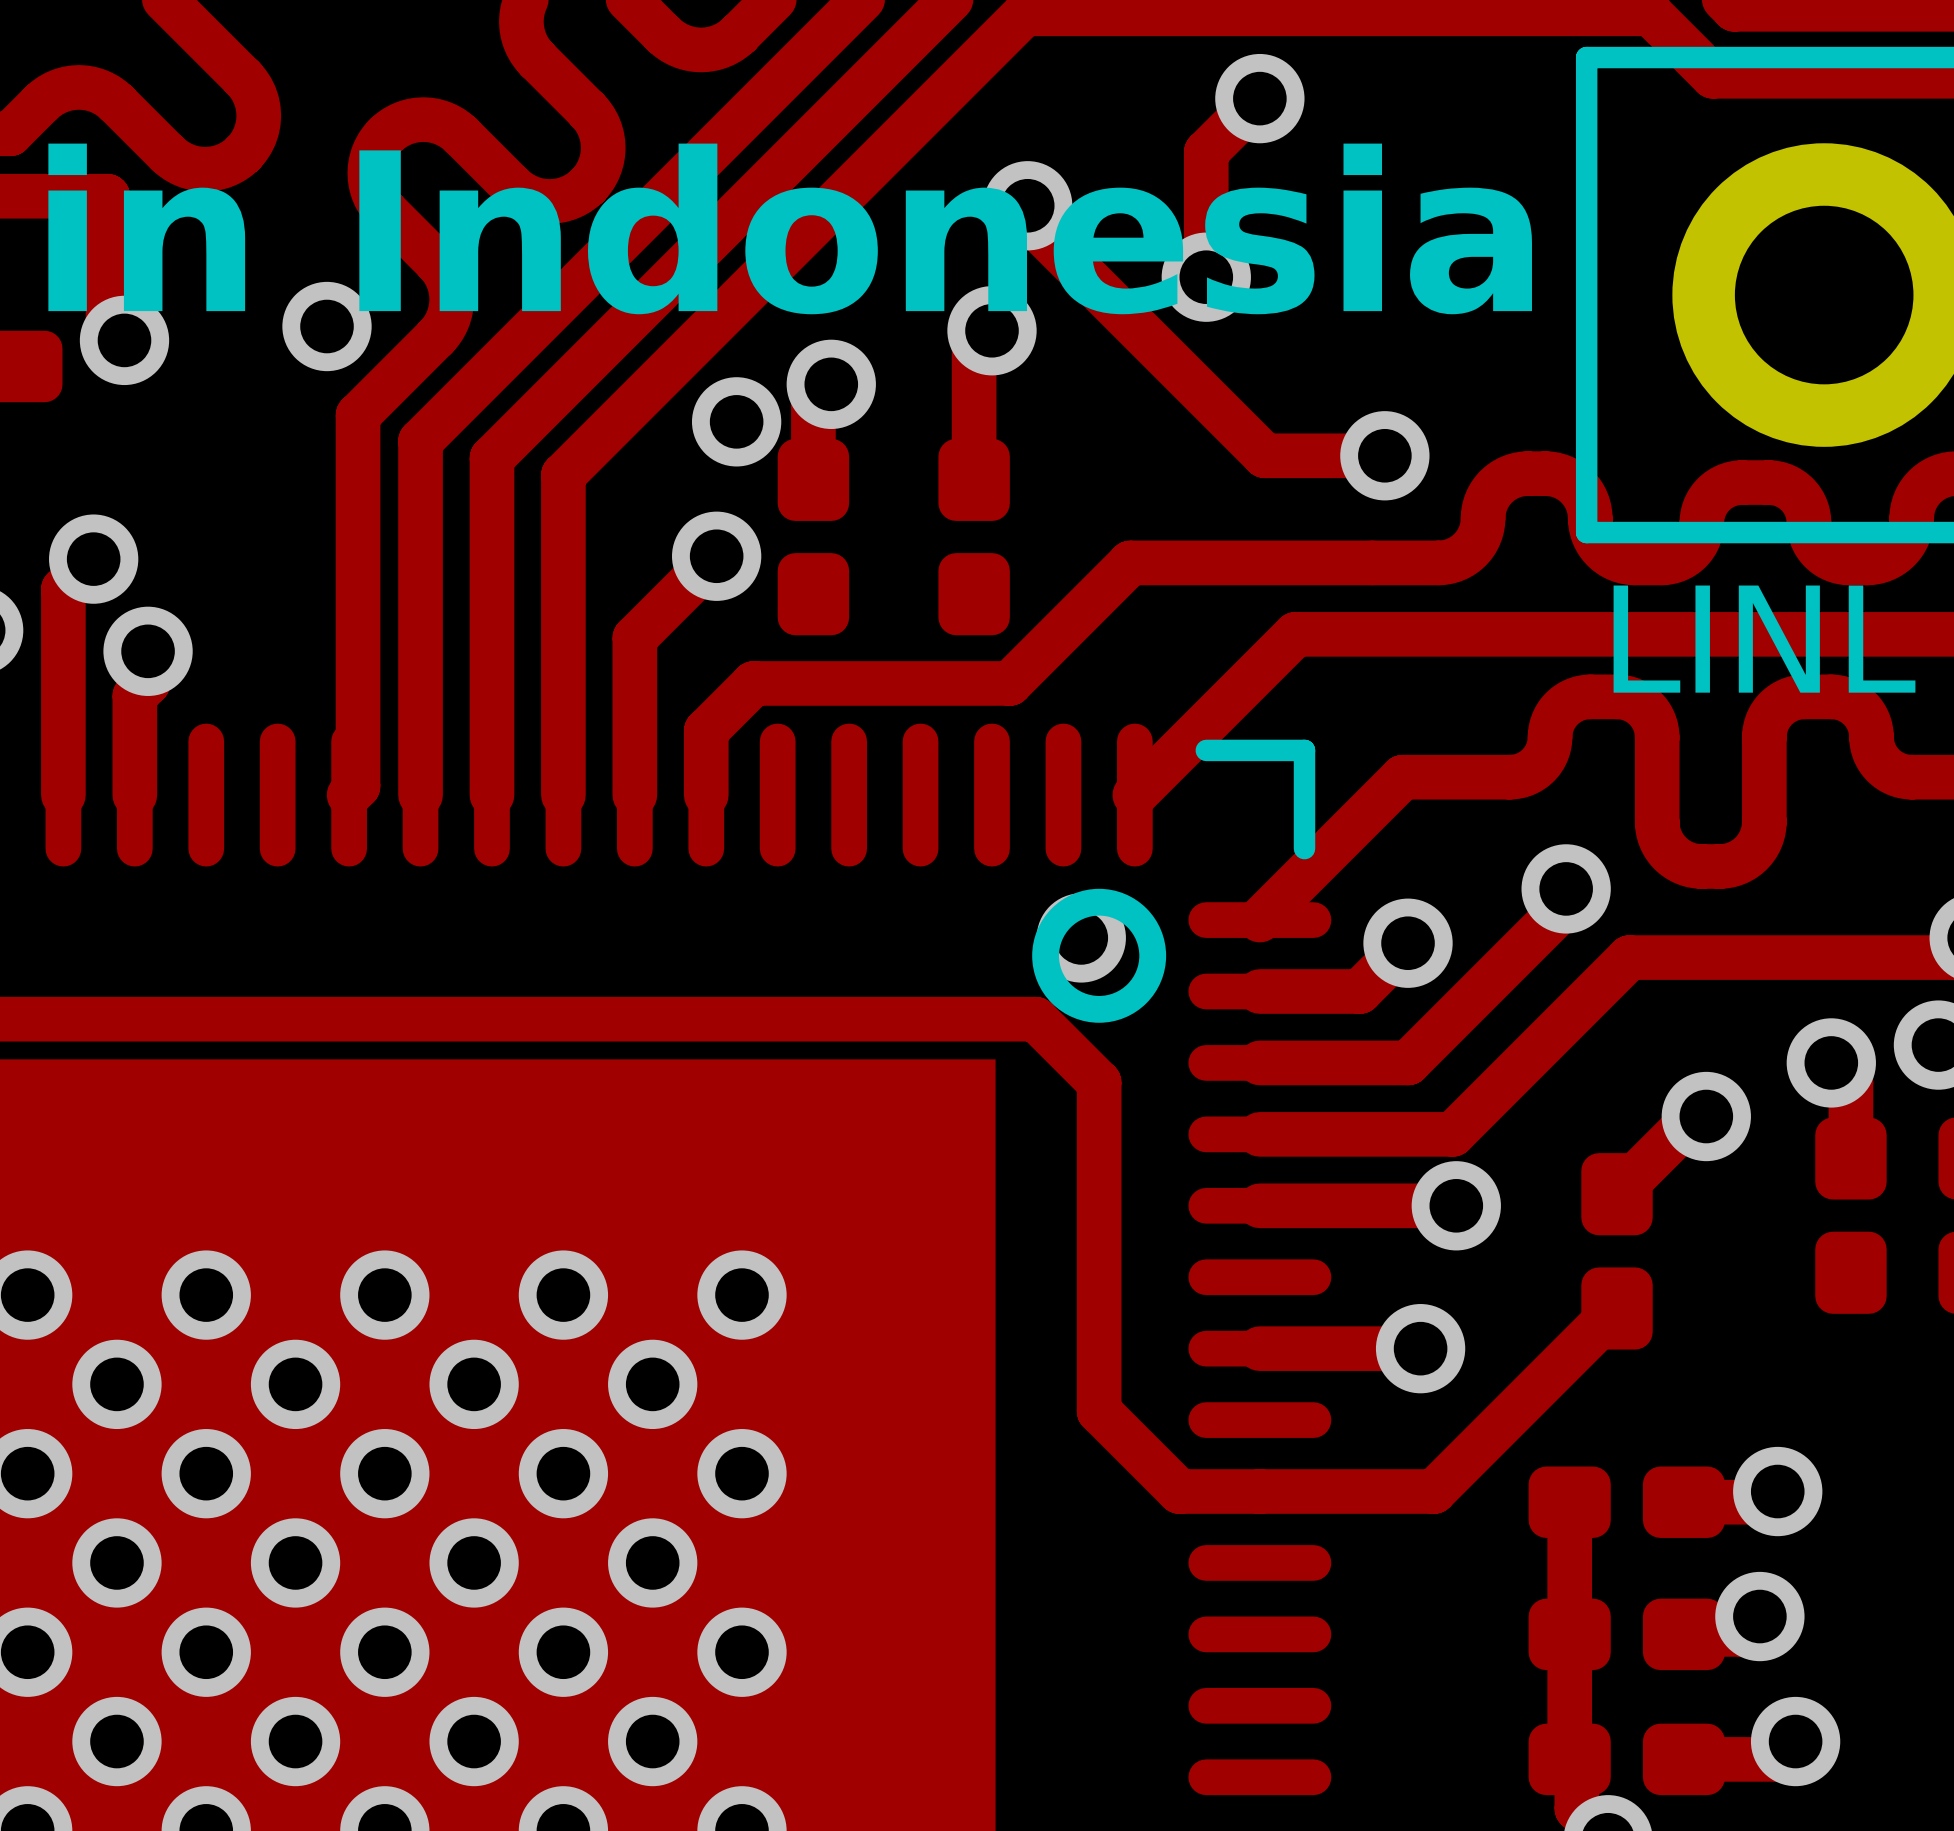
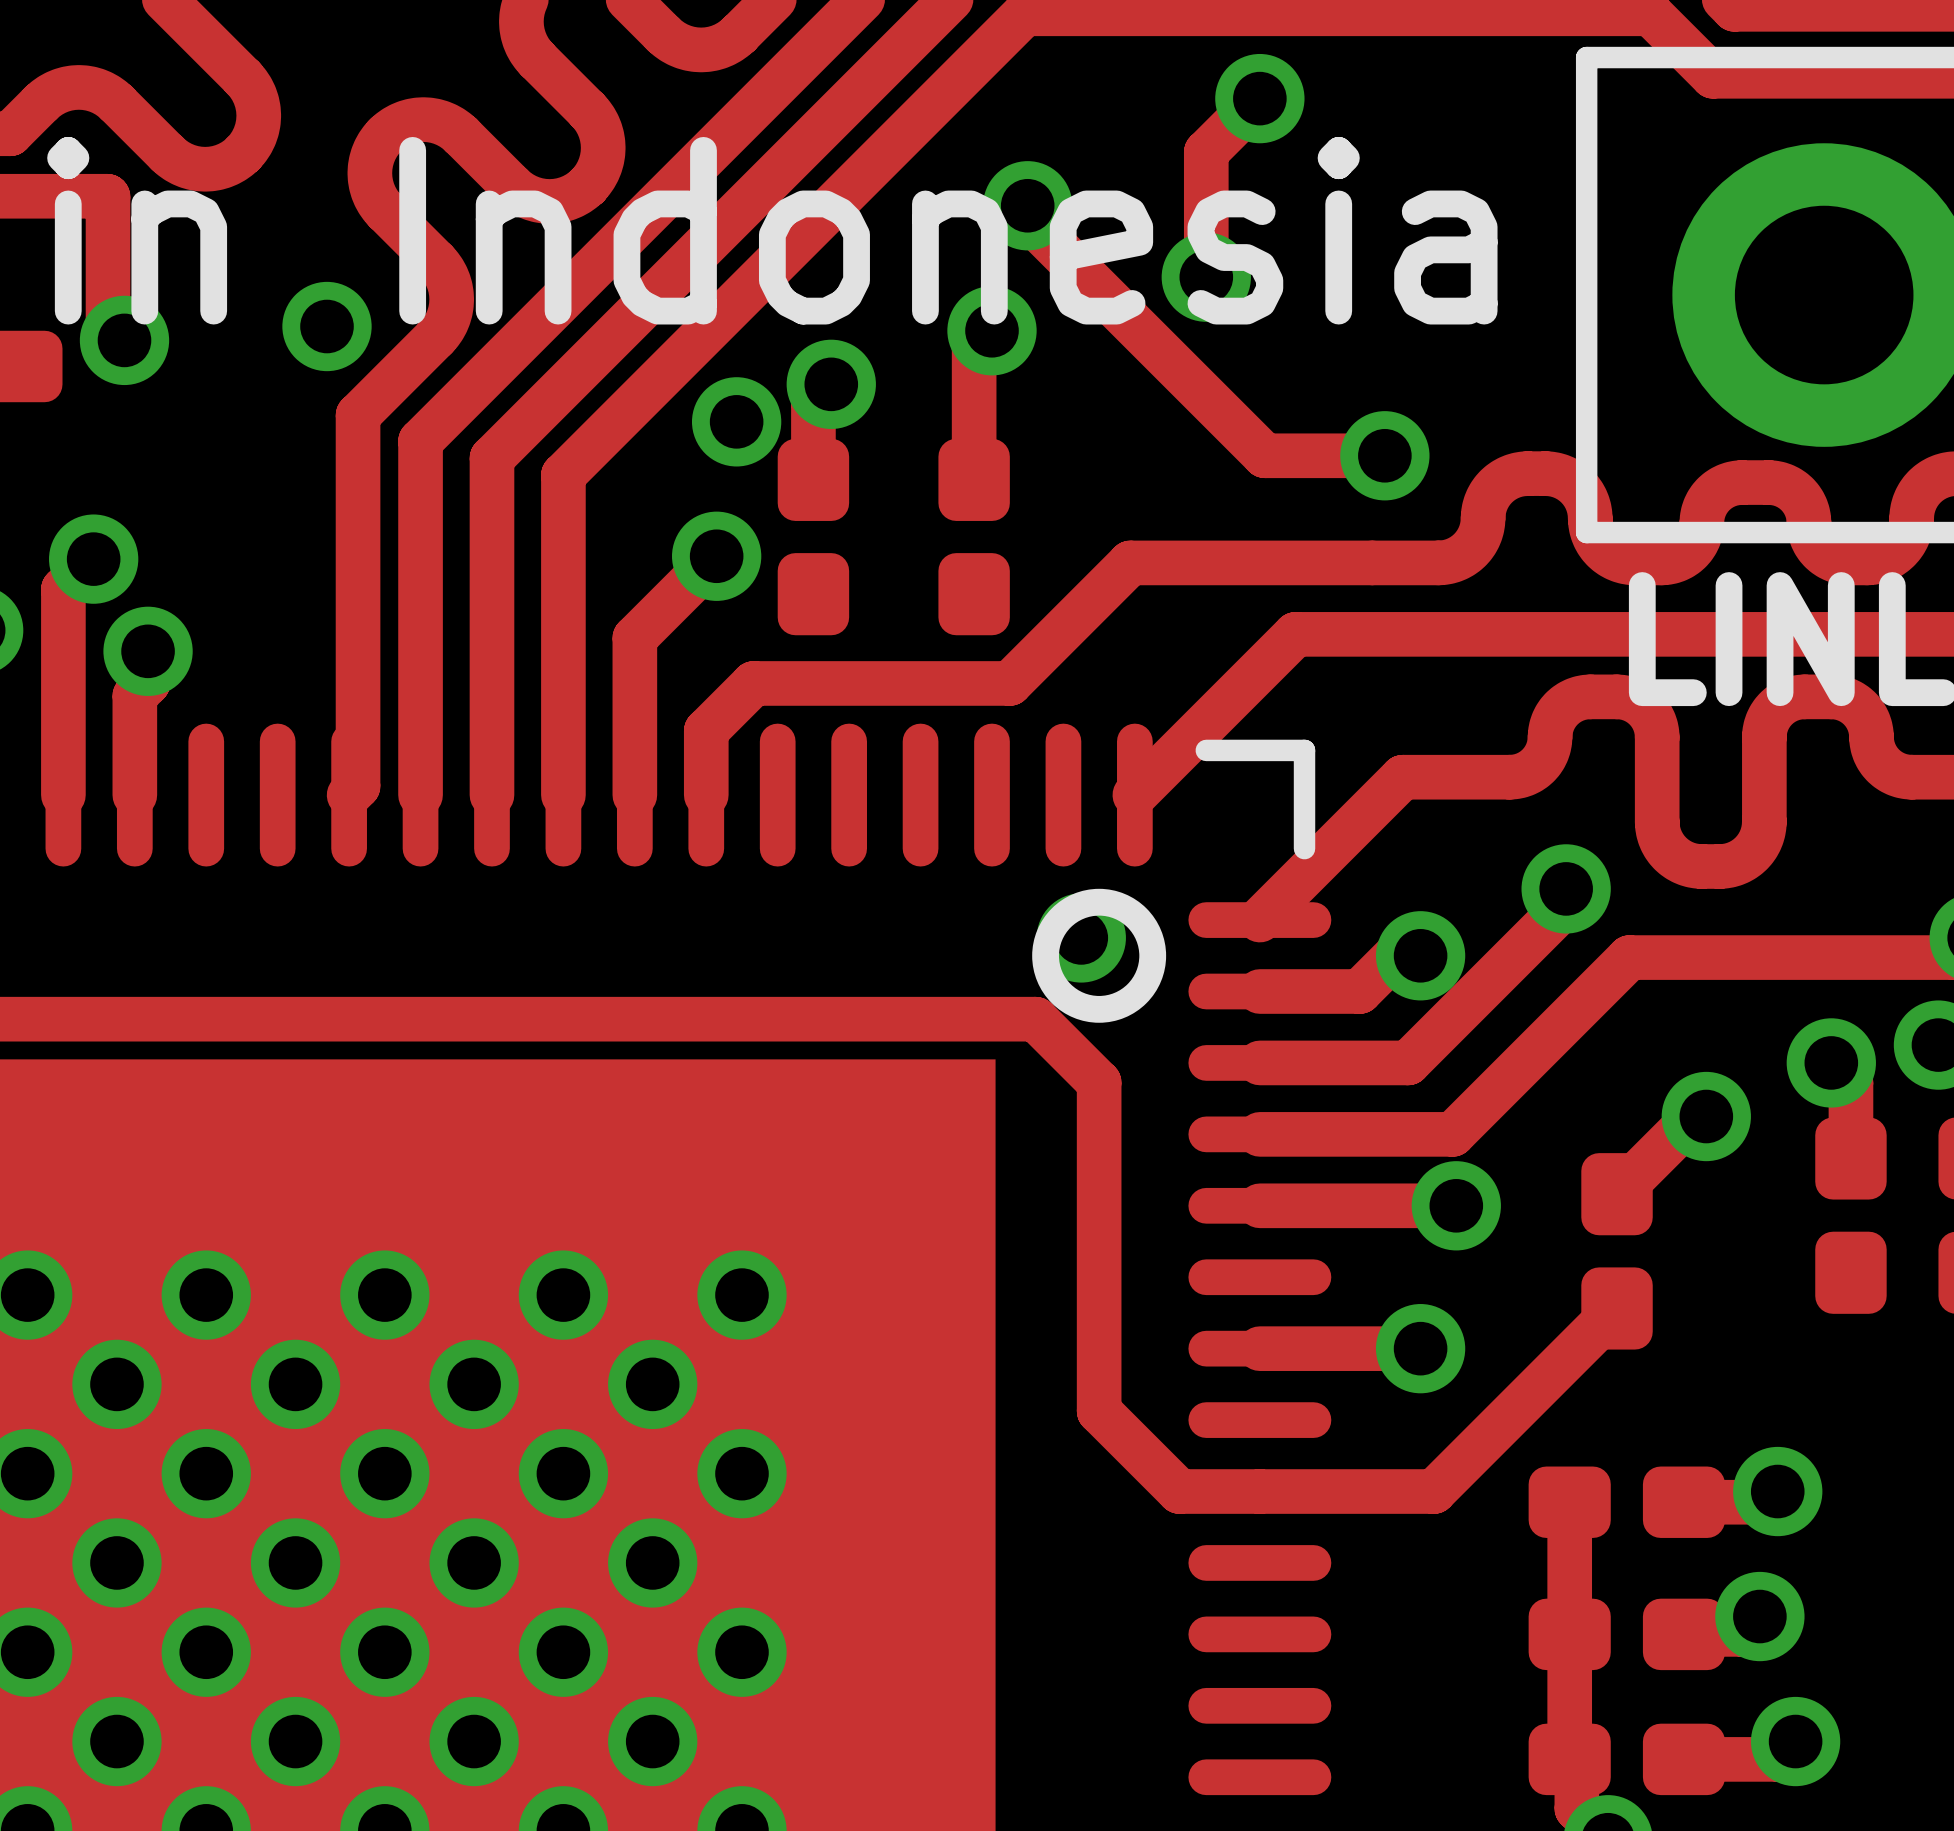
via position: (1408, 943) -> (1420, 955)

